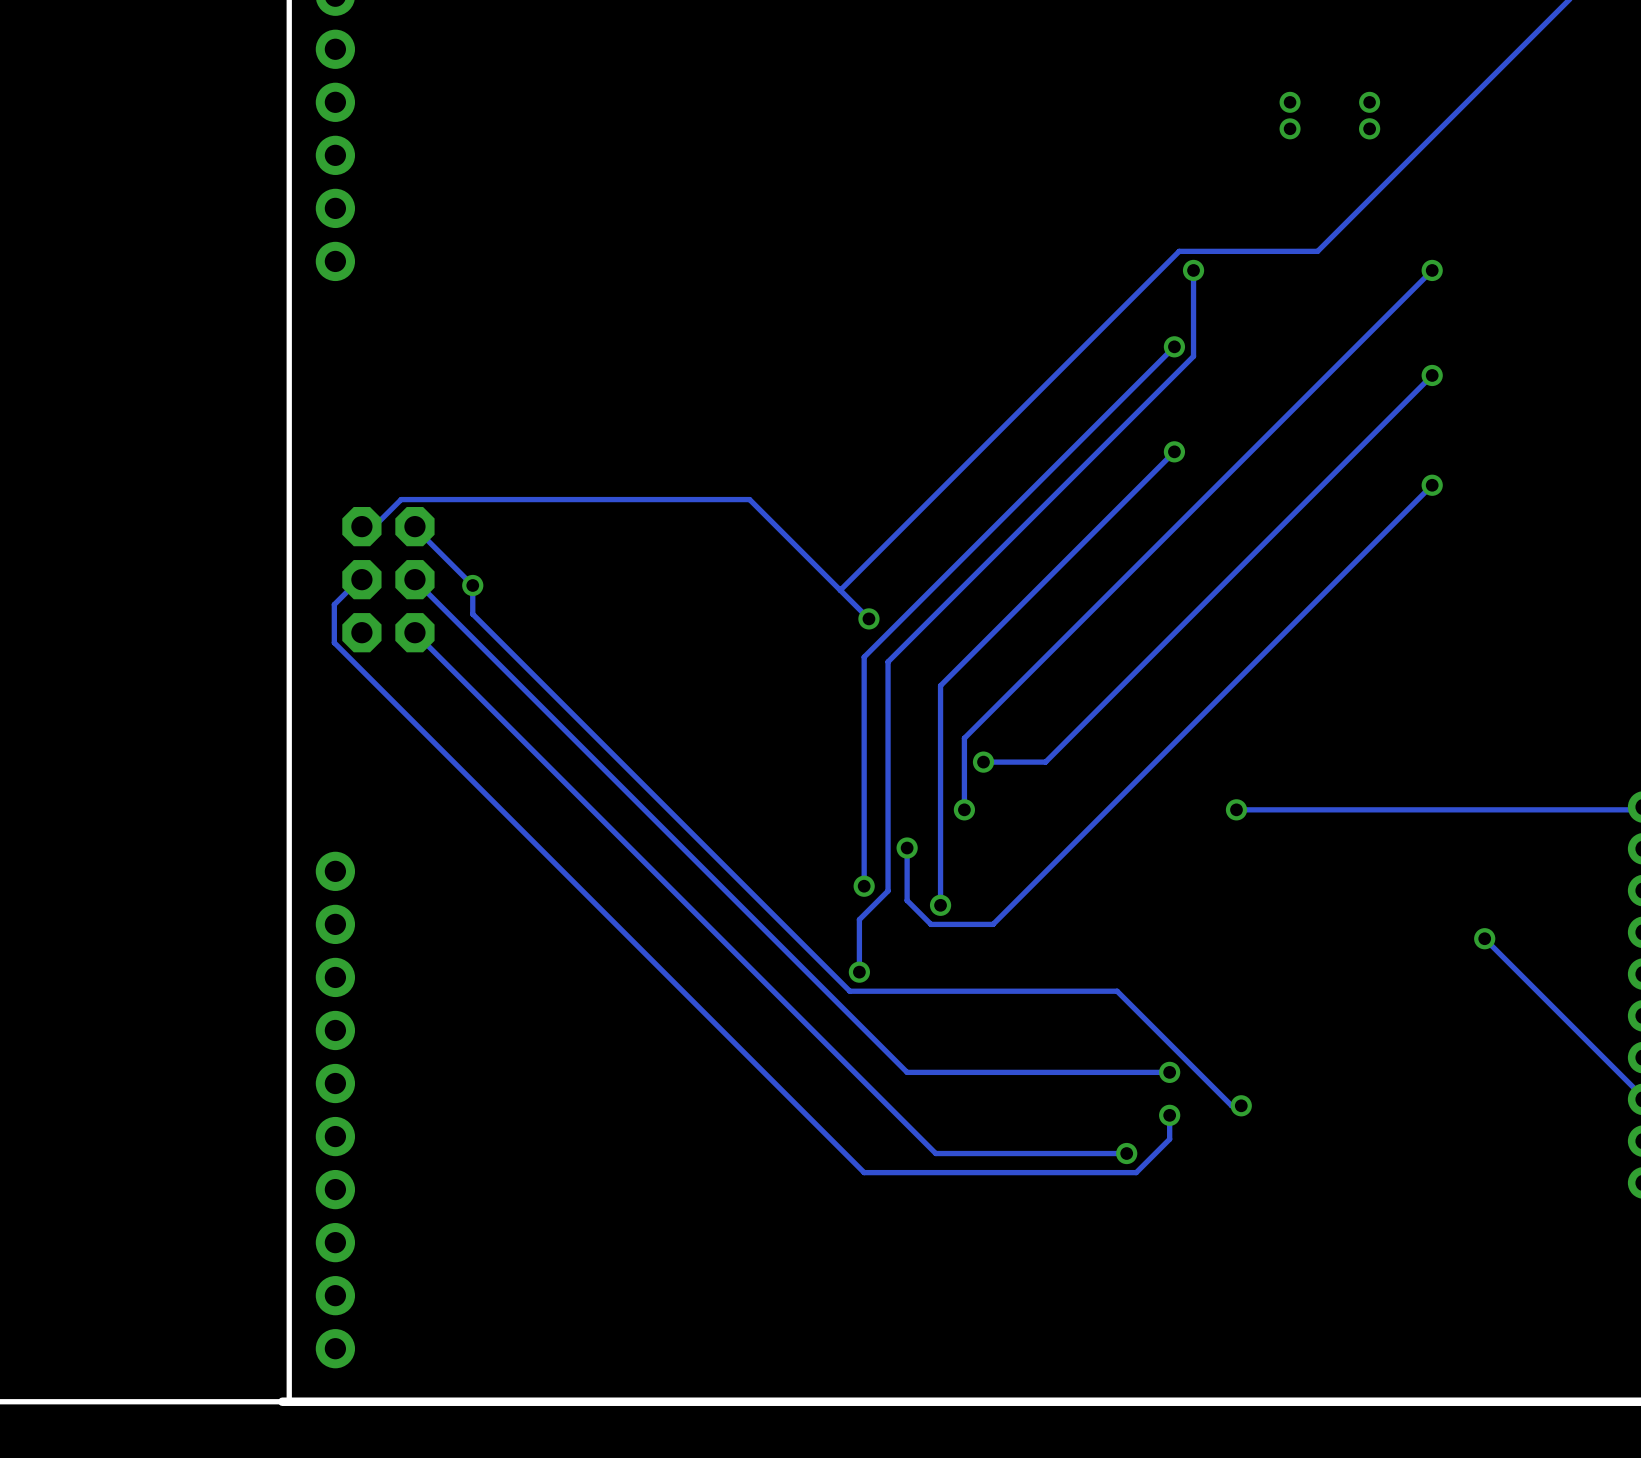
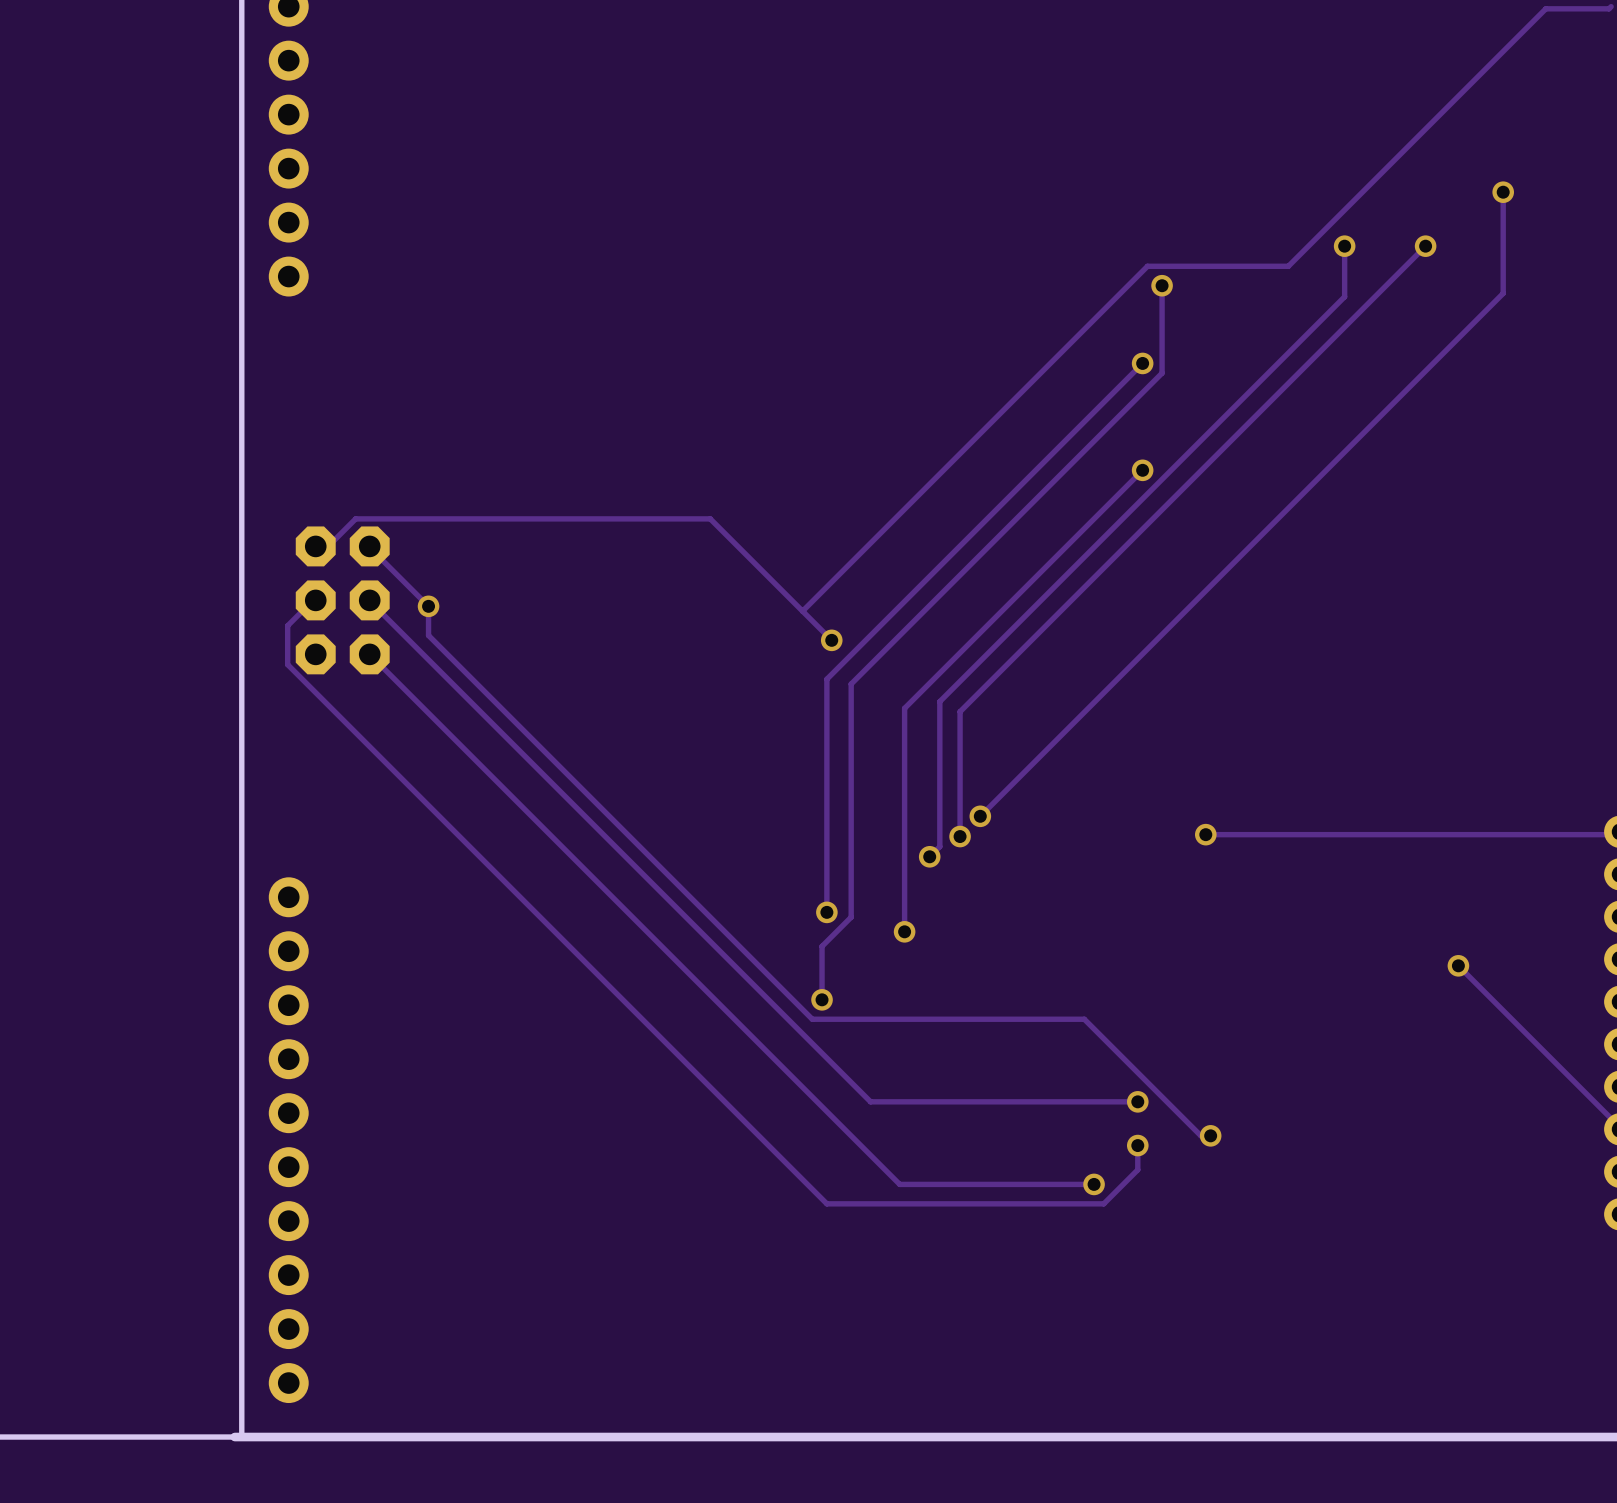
via: (1290, 102) -> none
via: (1369, 102) -> none
via: (1290, 128) -> none
via: (1369, 128) -> none
track: none -> (1503, 192) (1503, 293) (980, 816)
via: none -> (1503, 192)
track: none -> (1344, 246) (1344, 296) (939, 701) (939, 846) (929, 856)
via: none -> (1344, 246)
track: none -> (1425, 246) (960, 711) (960, 836)
via: none -> (1425, 246)
track: (1432, 270) (964, 738) (964, 809) -> none
via: (1432, 270) -> none
track: (1432, 375) (1045, 762) (983, 762) -> none
via: (1432, 375) -> none
track: (1432, 485) (993, 924) (931, 924) (907, 900) (907, 848) -> none
via: (1432, 485) -> none
via: (983, 762) -> none
via: none -> (980, 816)
via: (964, 809) -> none
via: none -> (960, 836)
via: none -> (929, 856)
via: (907, 848) -> none

